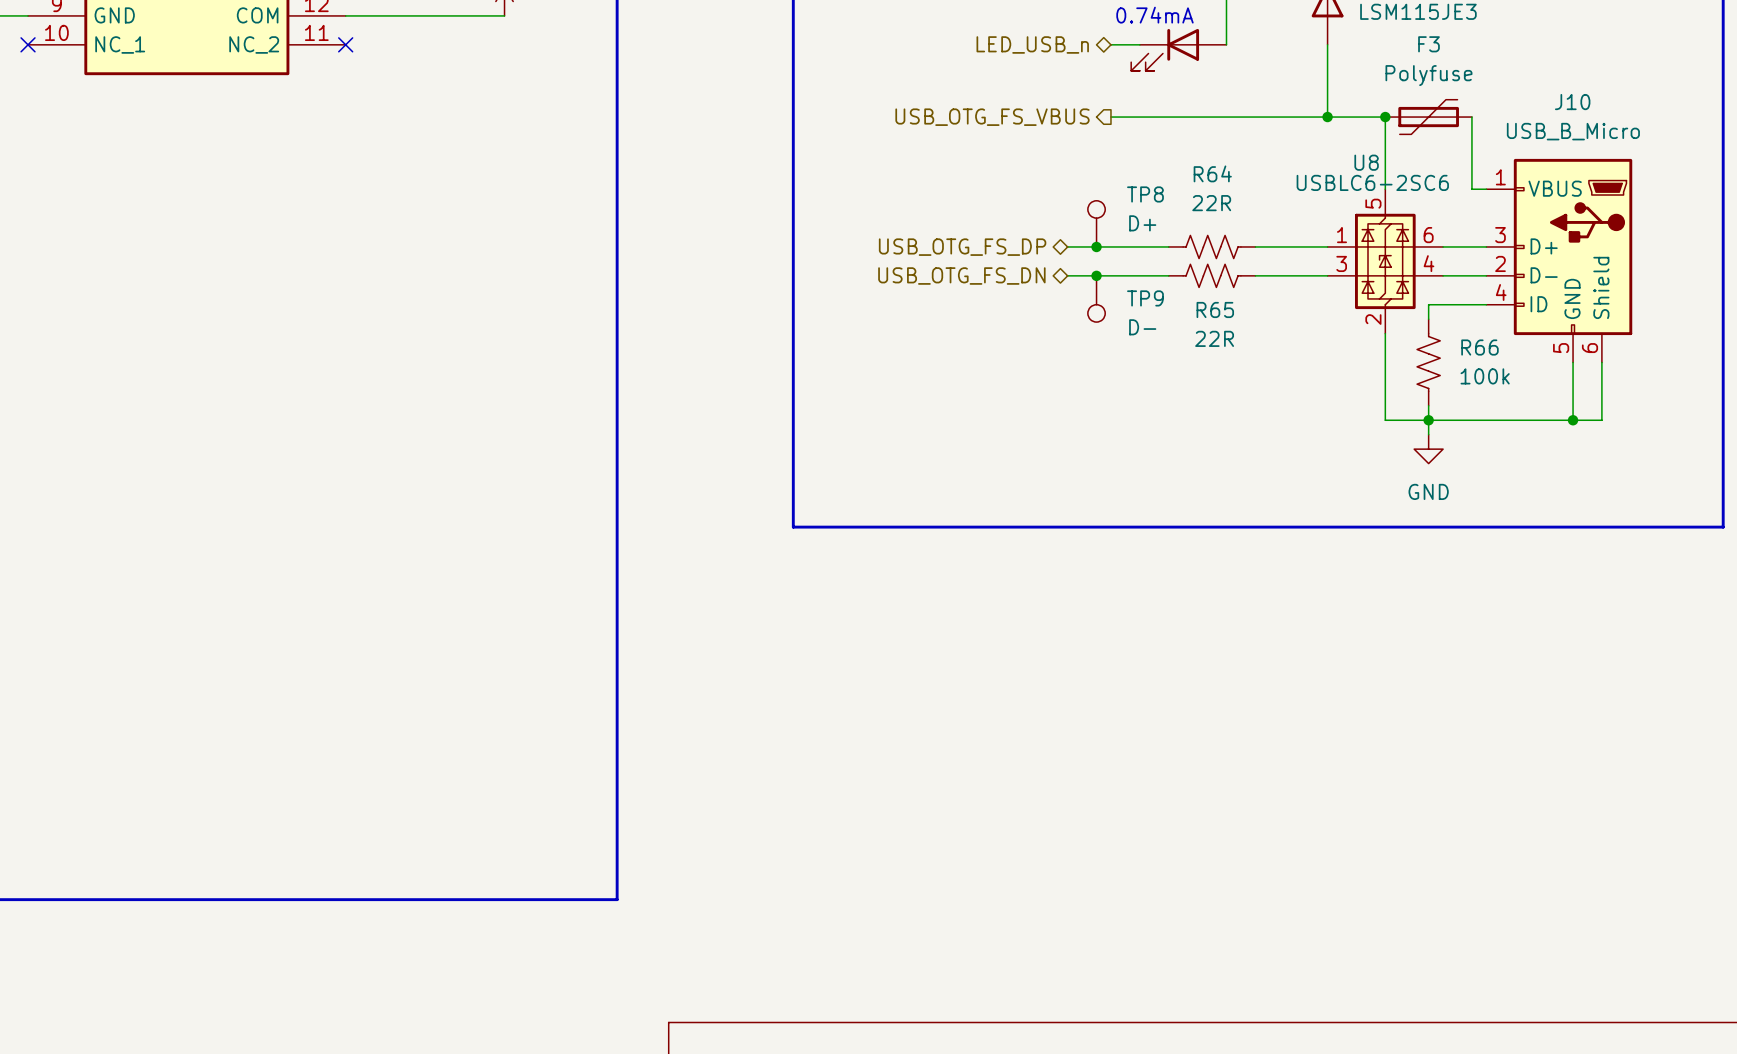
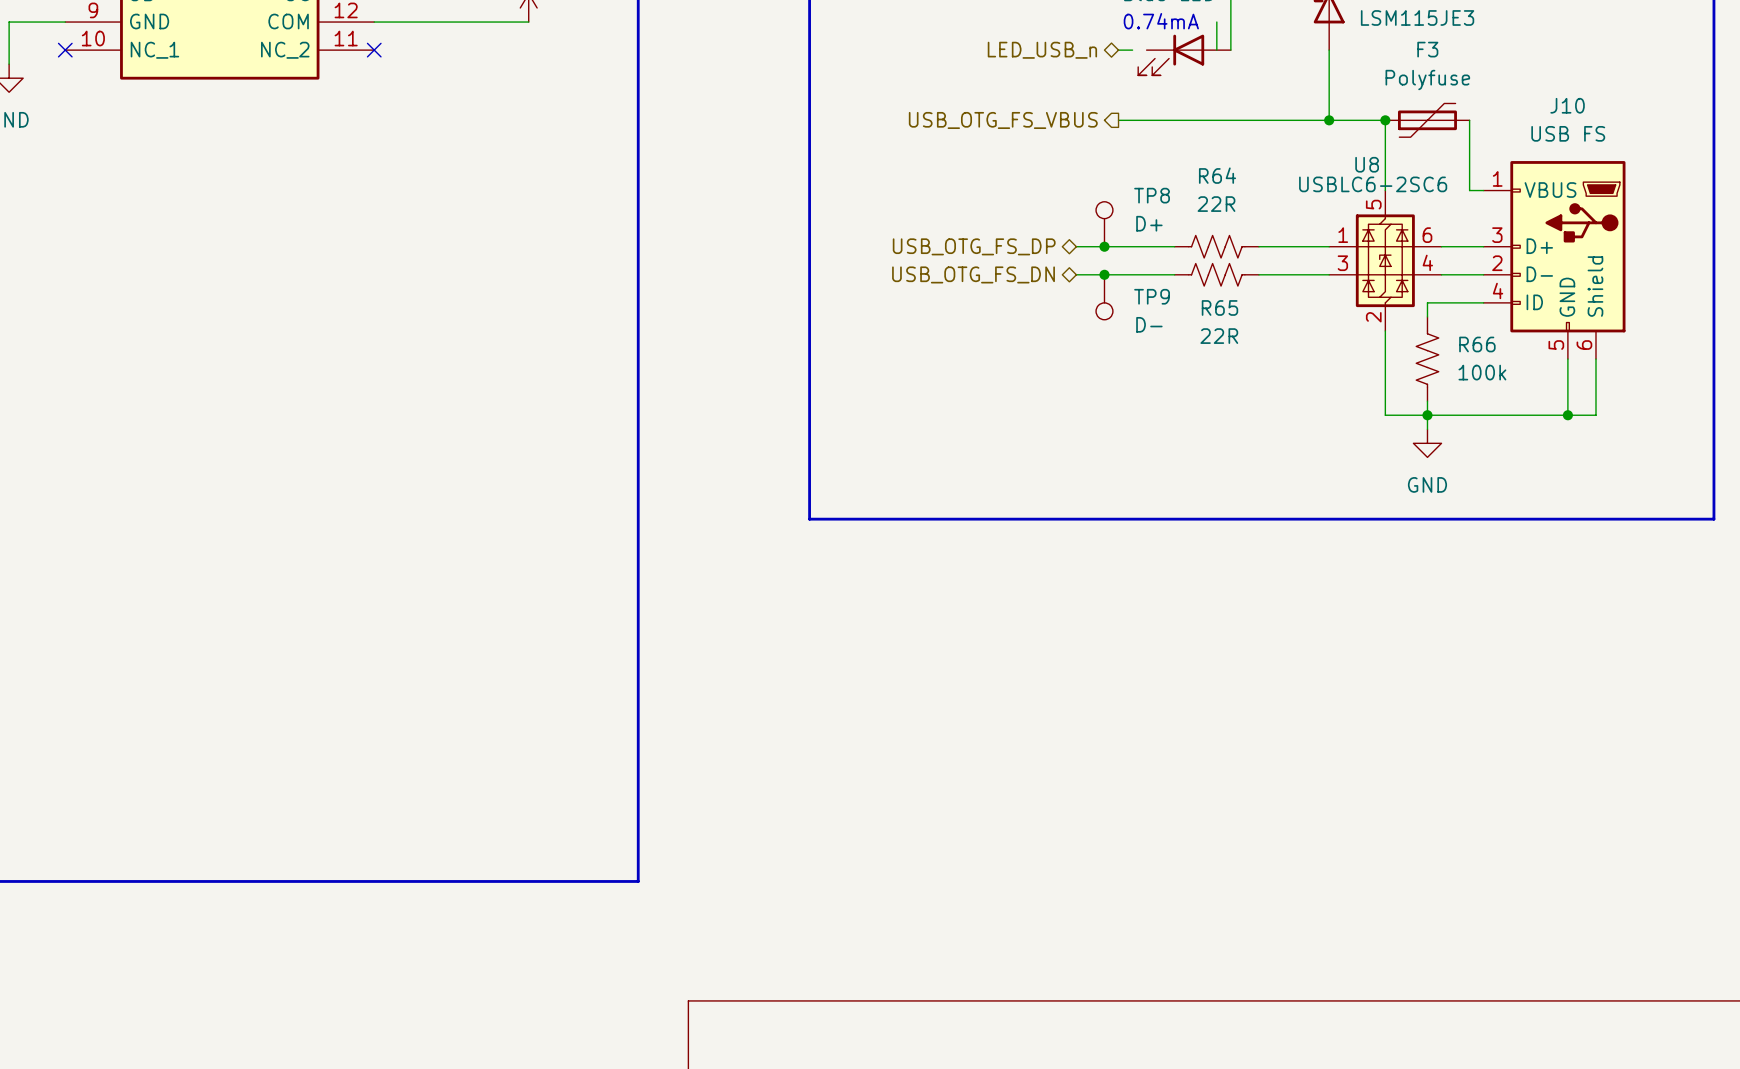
wire: none -> (1216, 22) (1216, 50)
wire: (1125, 44) (1139, 44) -> none
J10 value: USB_B_Micro (1573, 131) -> USB FS (1568, 133)

